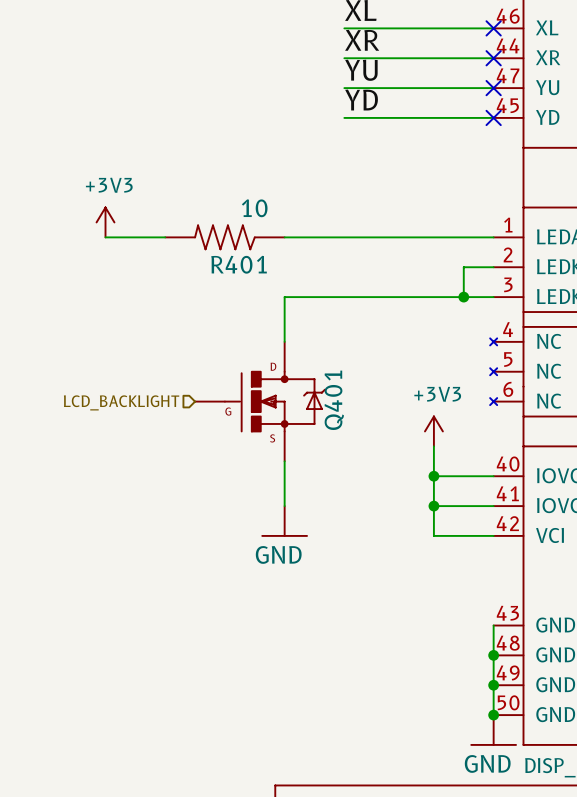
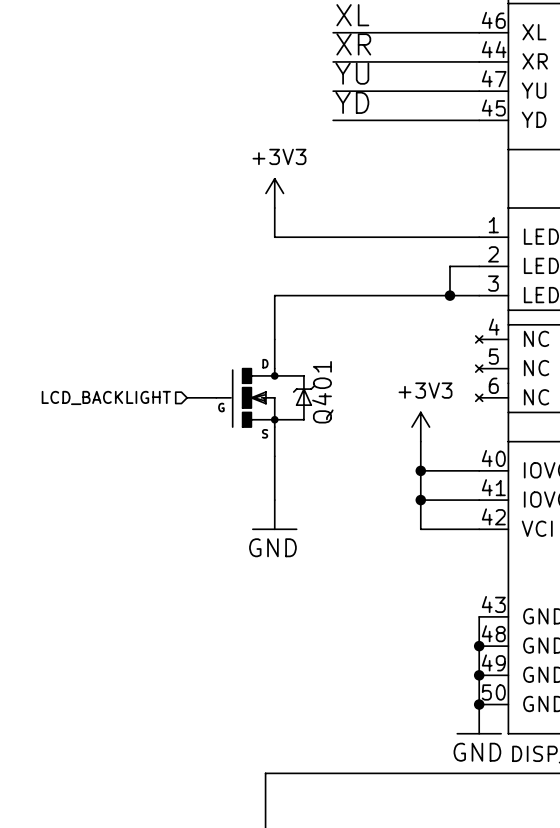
no-connect mark: (493, 28) -> none
no-connect mark: (493, 58) -> none
no-connect mark: (493, 88) -> none
no-connect mark: (493, 117) -> none
wire: none -> (274, 207) (274, 237)
power symbol position: +3V3 (105, 222) -> +3V3 (274, 193)
wire: (105, 237) (165, 237) -> none
R401: 10 (224, 237) -> none

